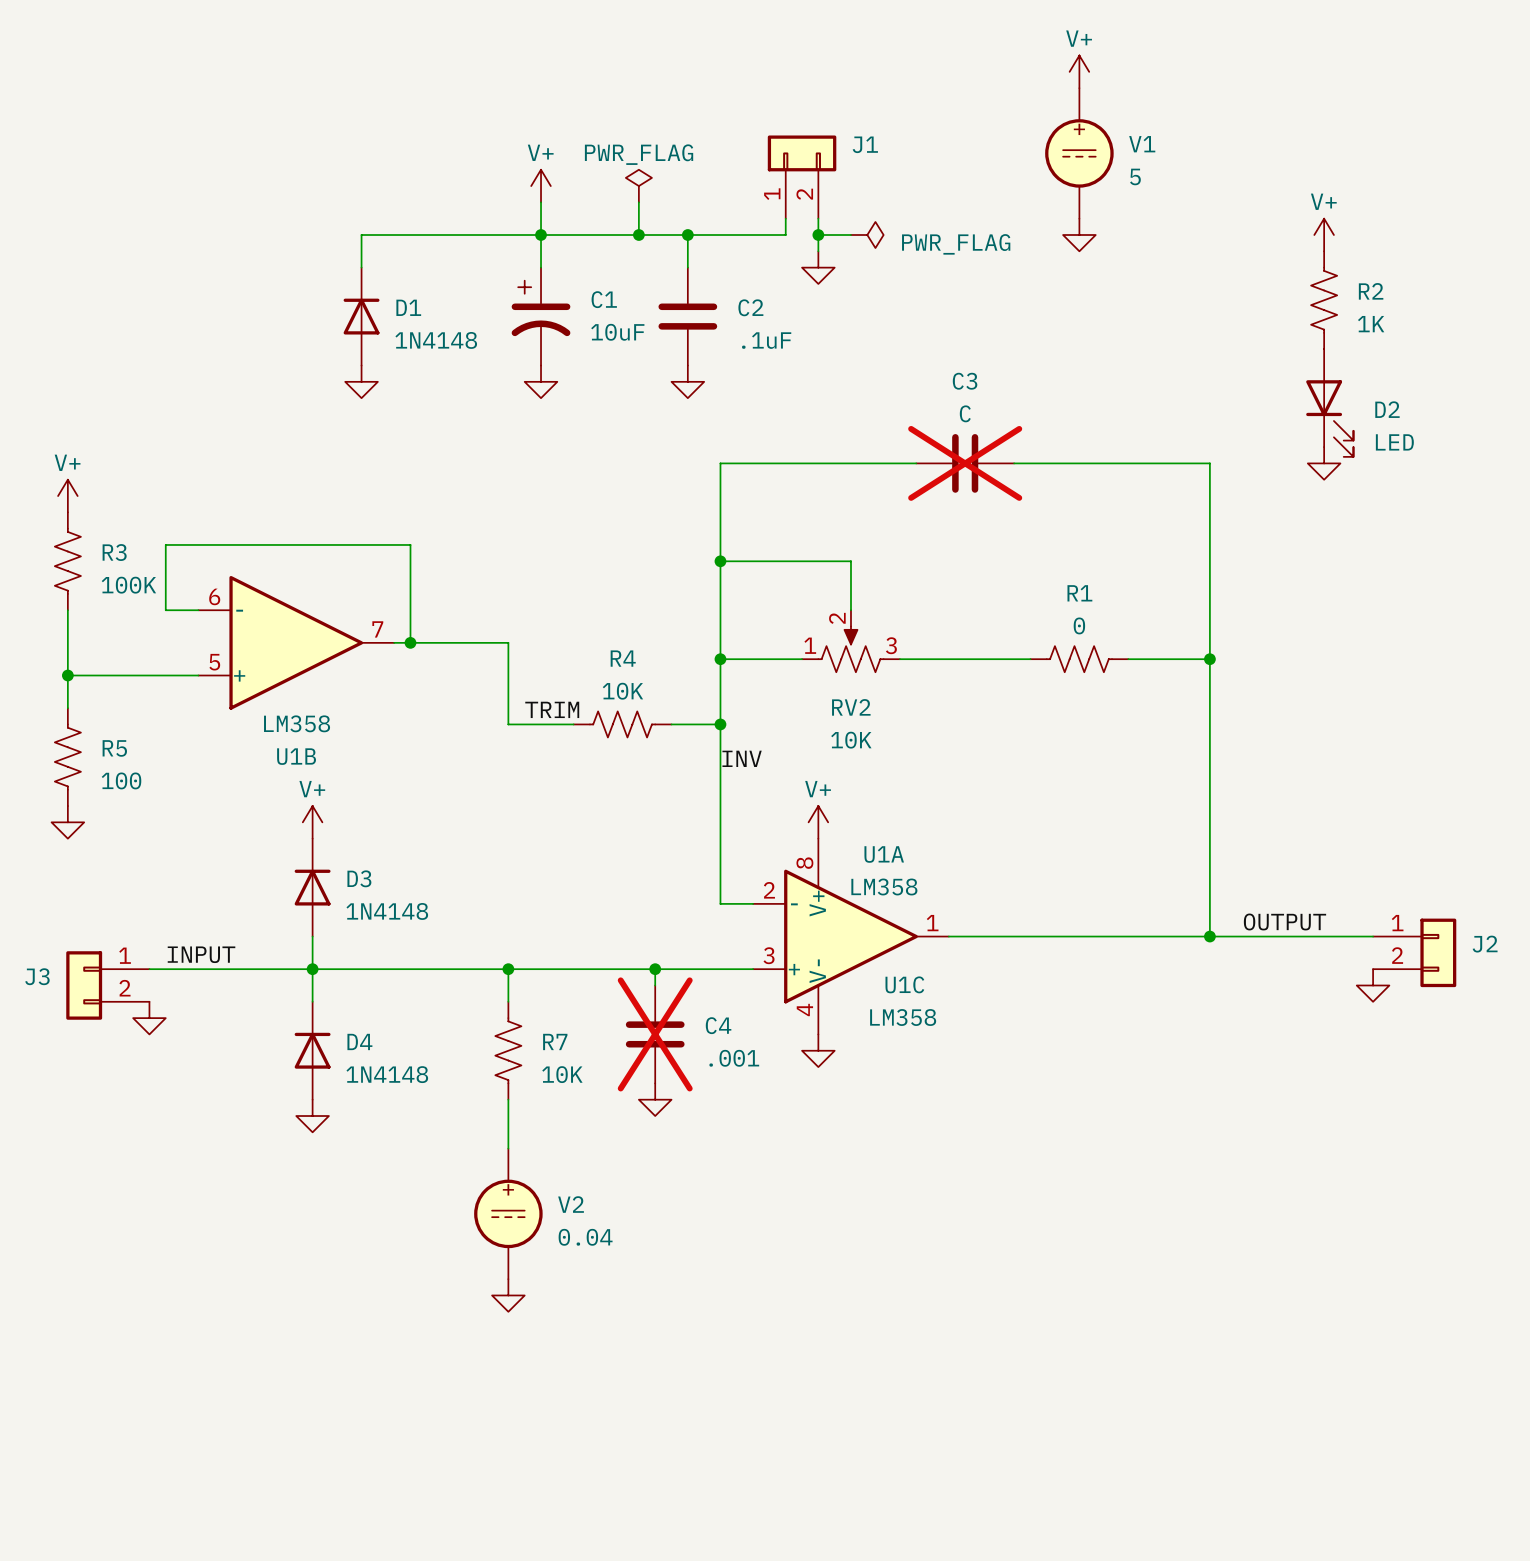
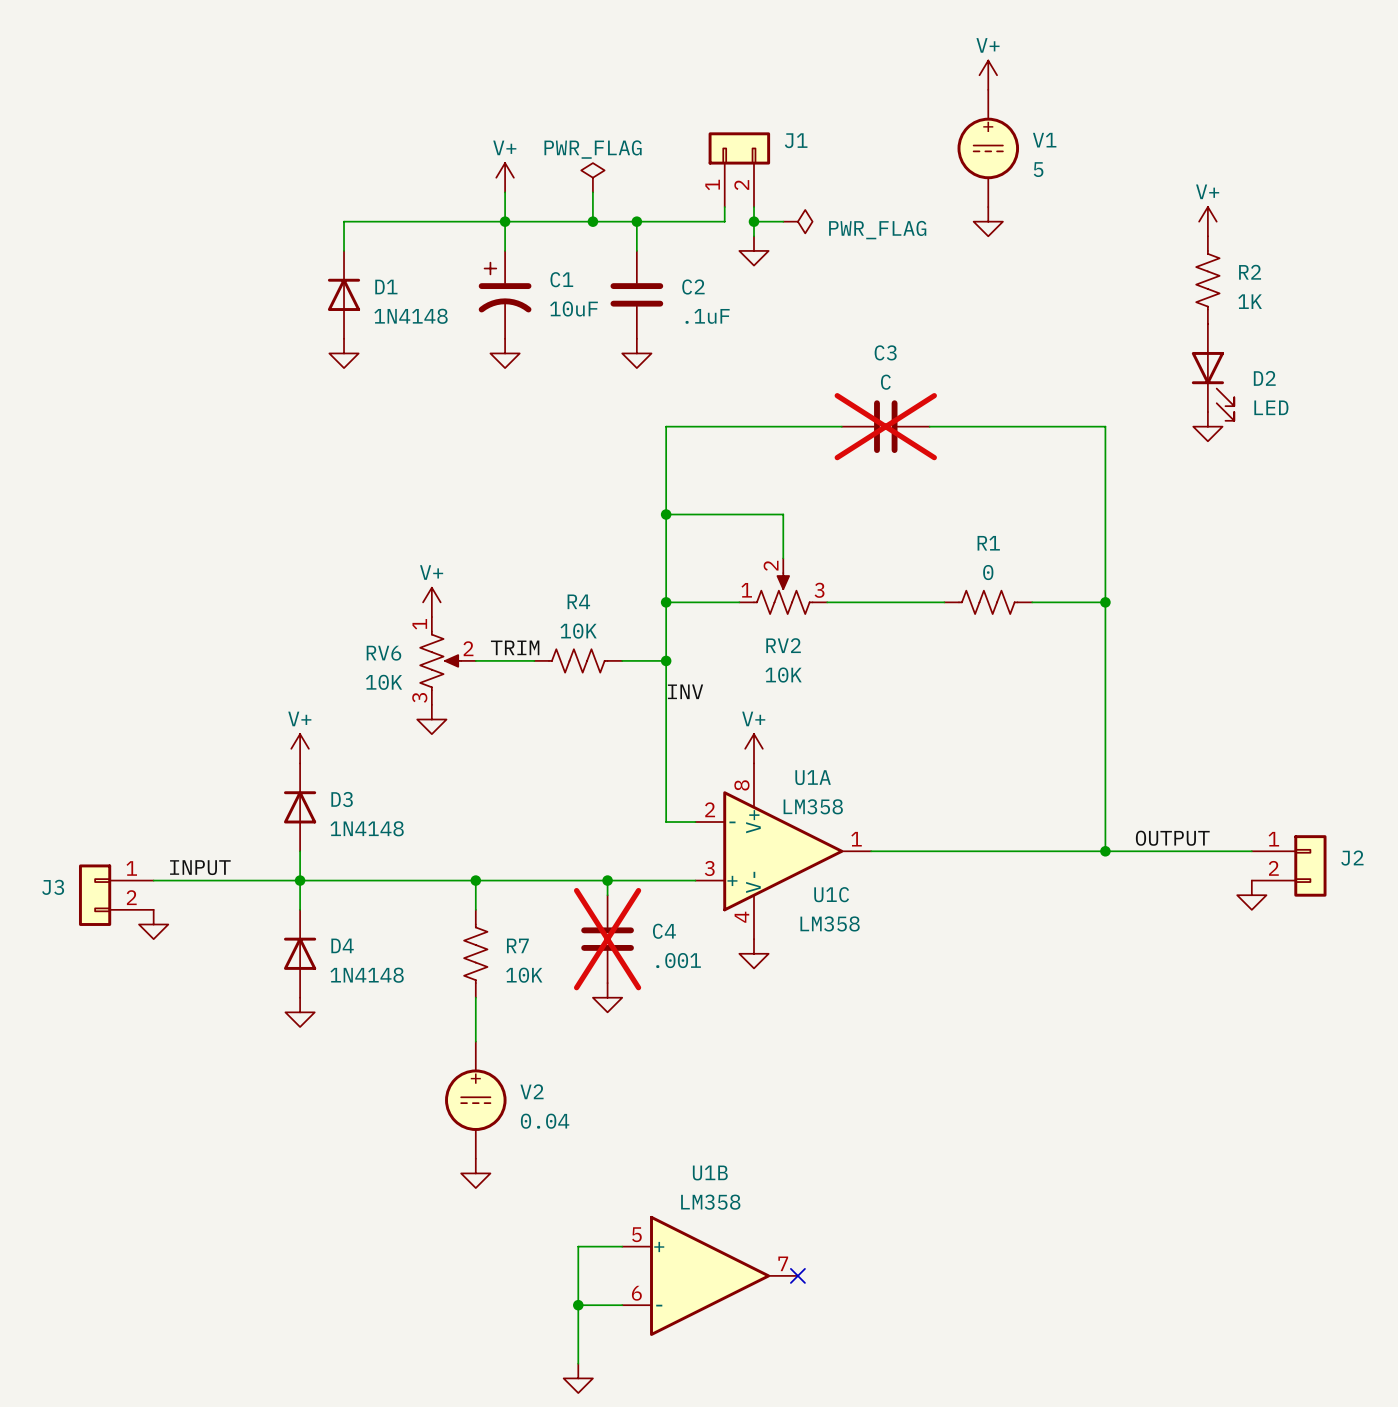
power symbol: V+ (67, 496) -> none
R3: 100K (67, 561) -> none
wire: (67, 610) (67, 708) -> none
wire: (198, 610) (165, 610) (165, 544) (410, 544) (410, 642) -> none
U1B flip: as is (296, 642) -> up-down (710, 1275)
U1B position: (296, 642) -> (710, 1275)
wire: (394, 642) (508, 642) (508, 724) -> none
junction: (410, 642) -> none
power symbol: none -> V+ (431, 602)
wire: (67, 675) (198, 675) -> none
junction: (67, 675) -> none
RV6: none -> 10K (447, 660)
R5: 100 (67, 757) -> none
power symbol: none -> (431, 719)
power symbol: (67, 822) -> none
wire: none -> (622, 1246) (578, 1246) (578, 1363)
no-connect mark: none -> (797, 1275)
wire: none -> (578, 1305) (622, 1305)
junction: none -> (578, 1305)
power symbol: none -> (578, 1378)

